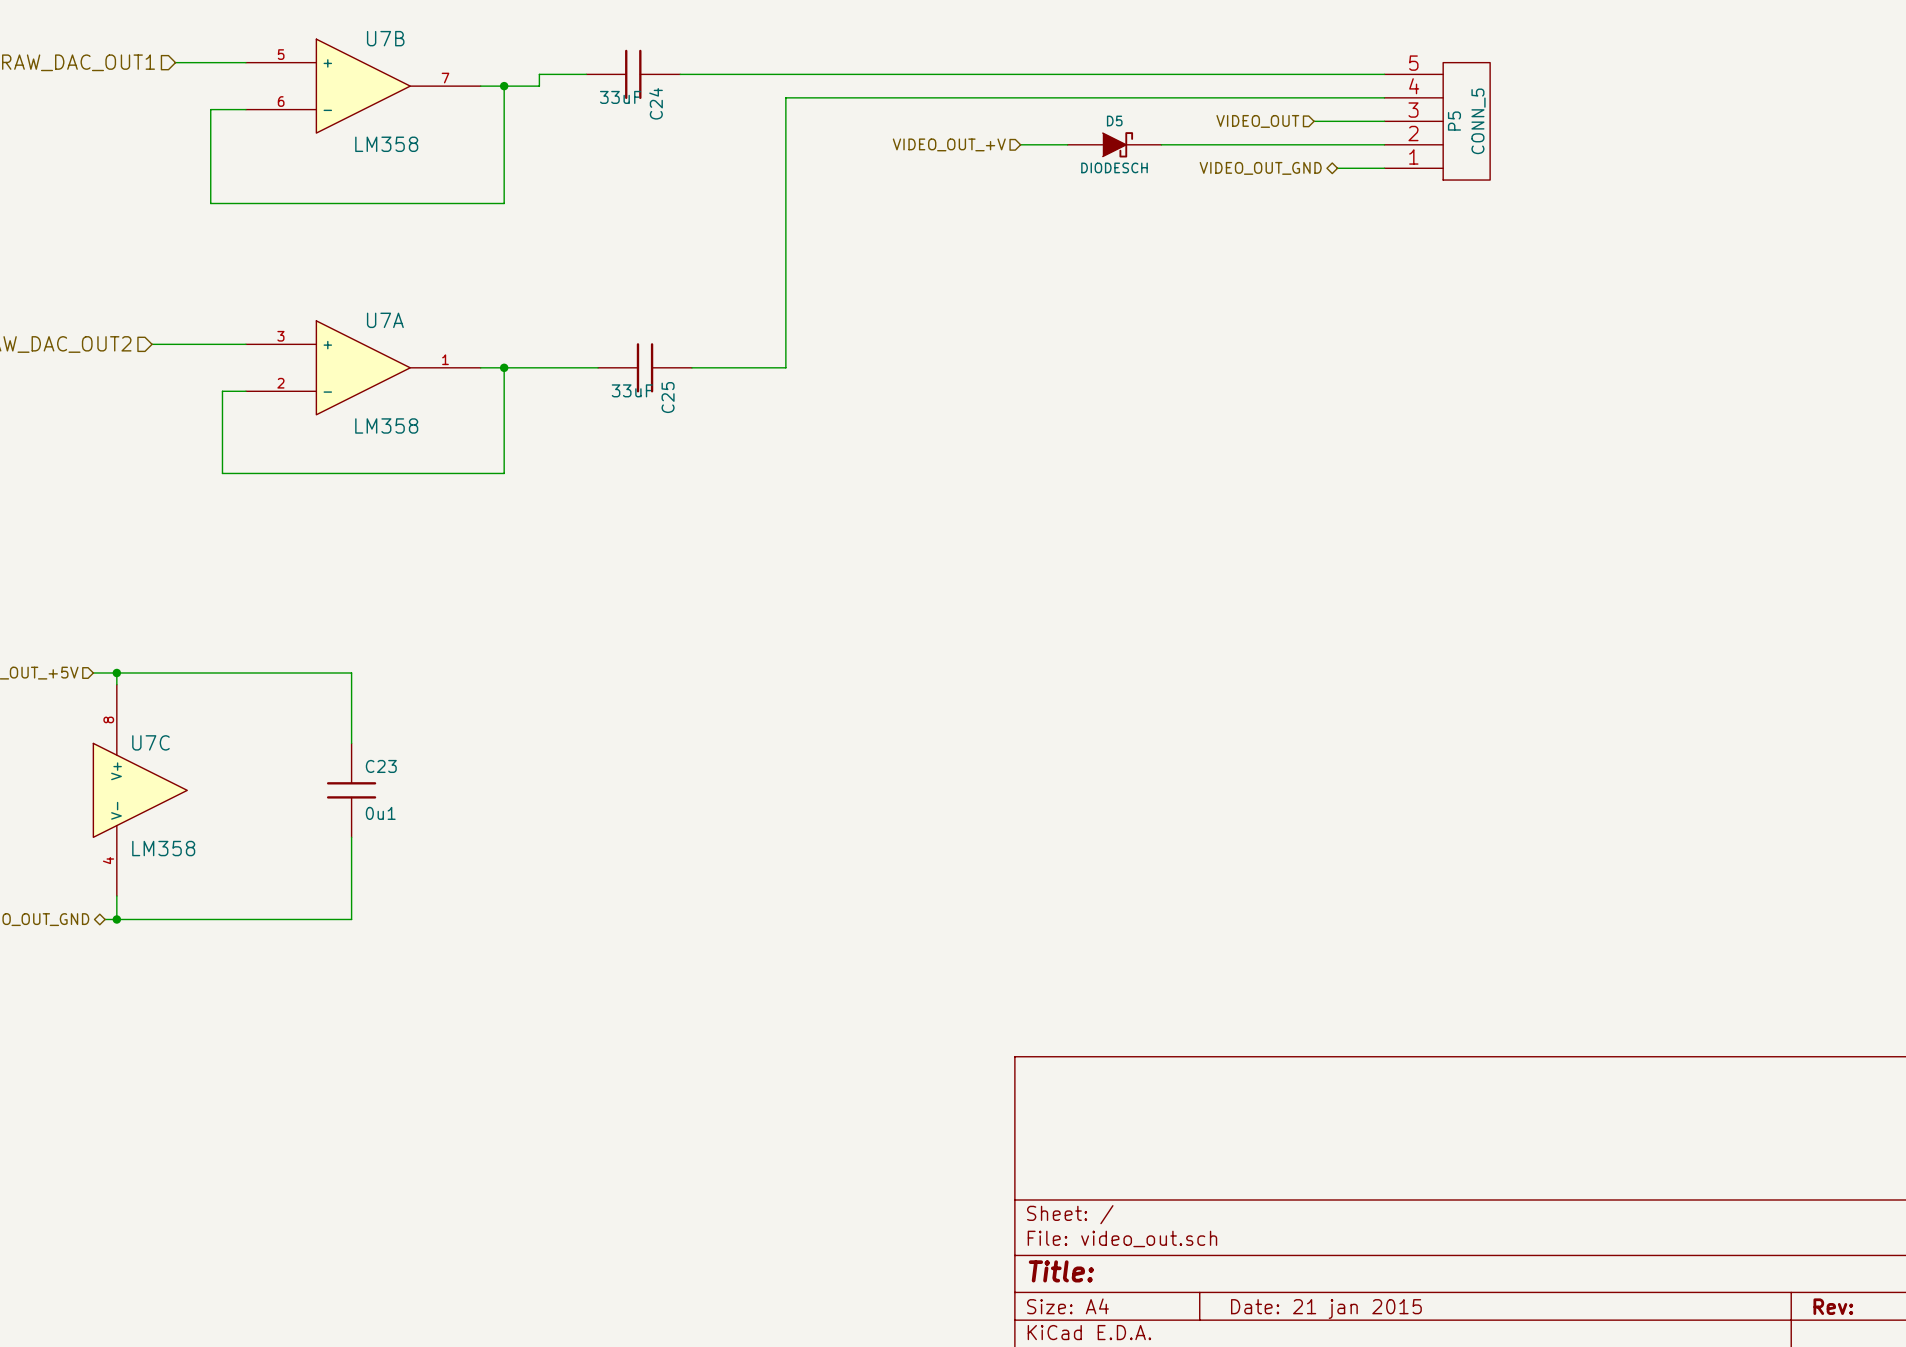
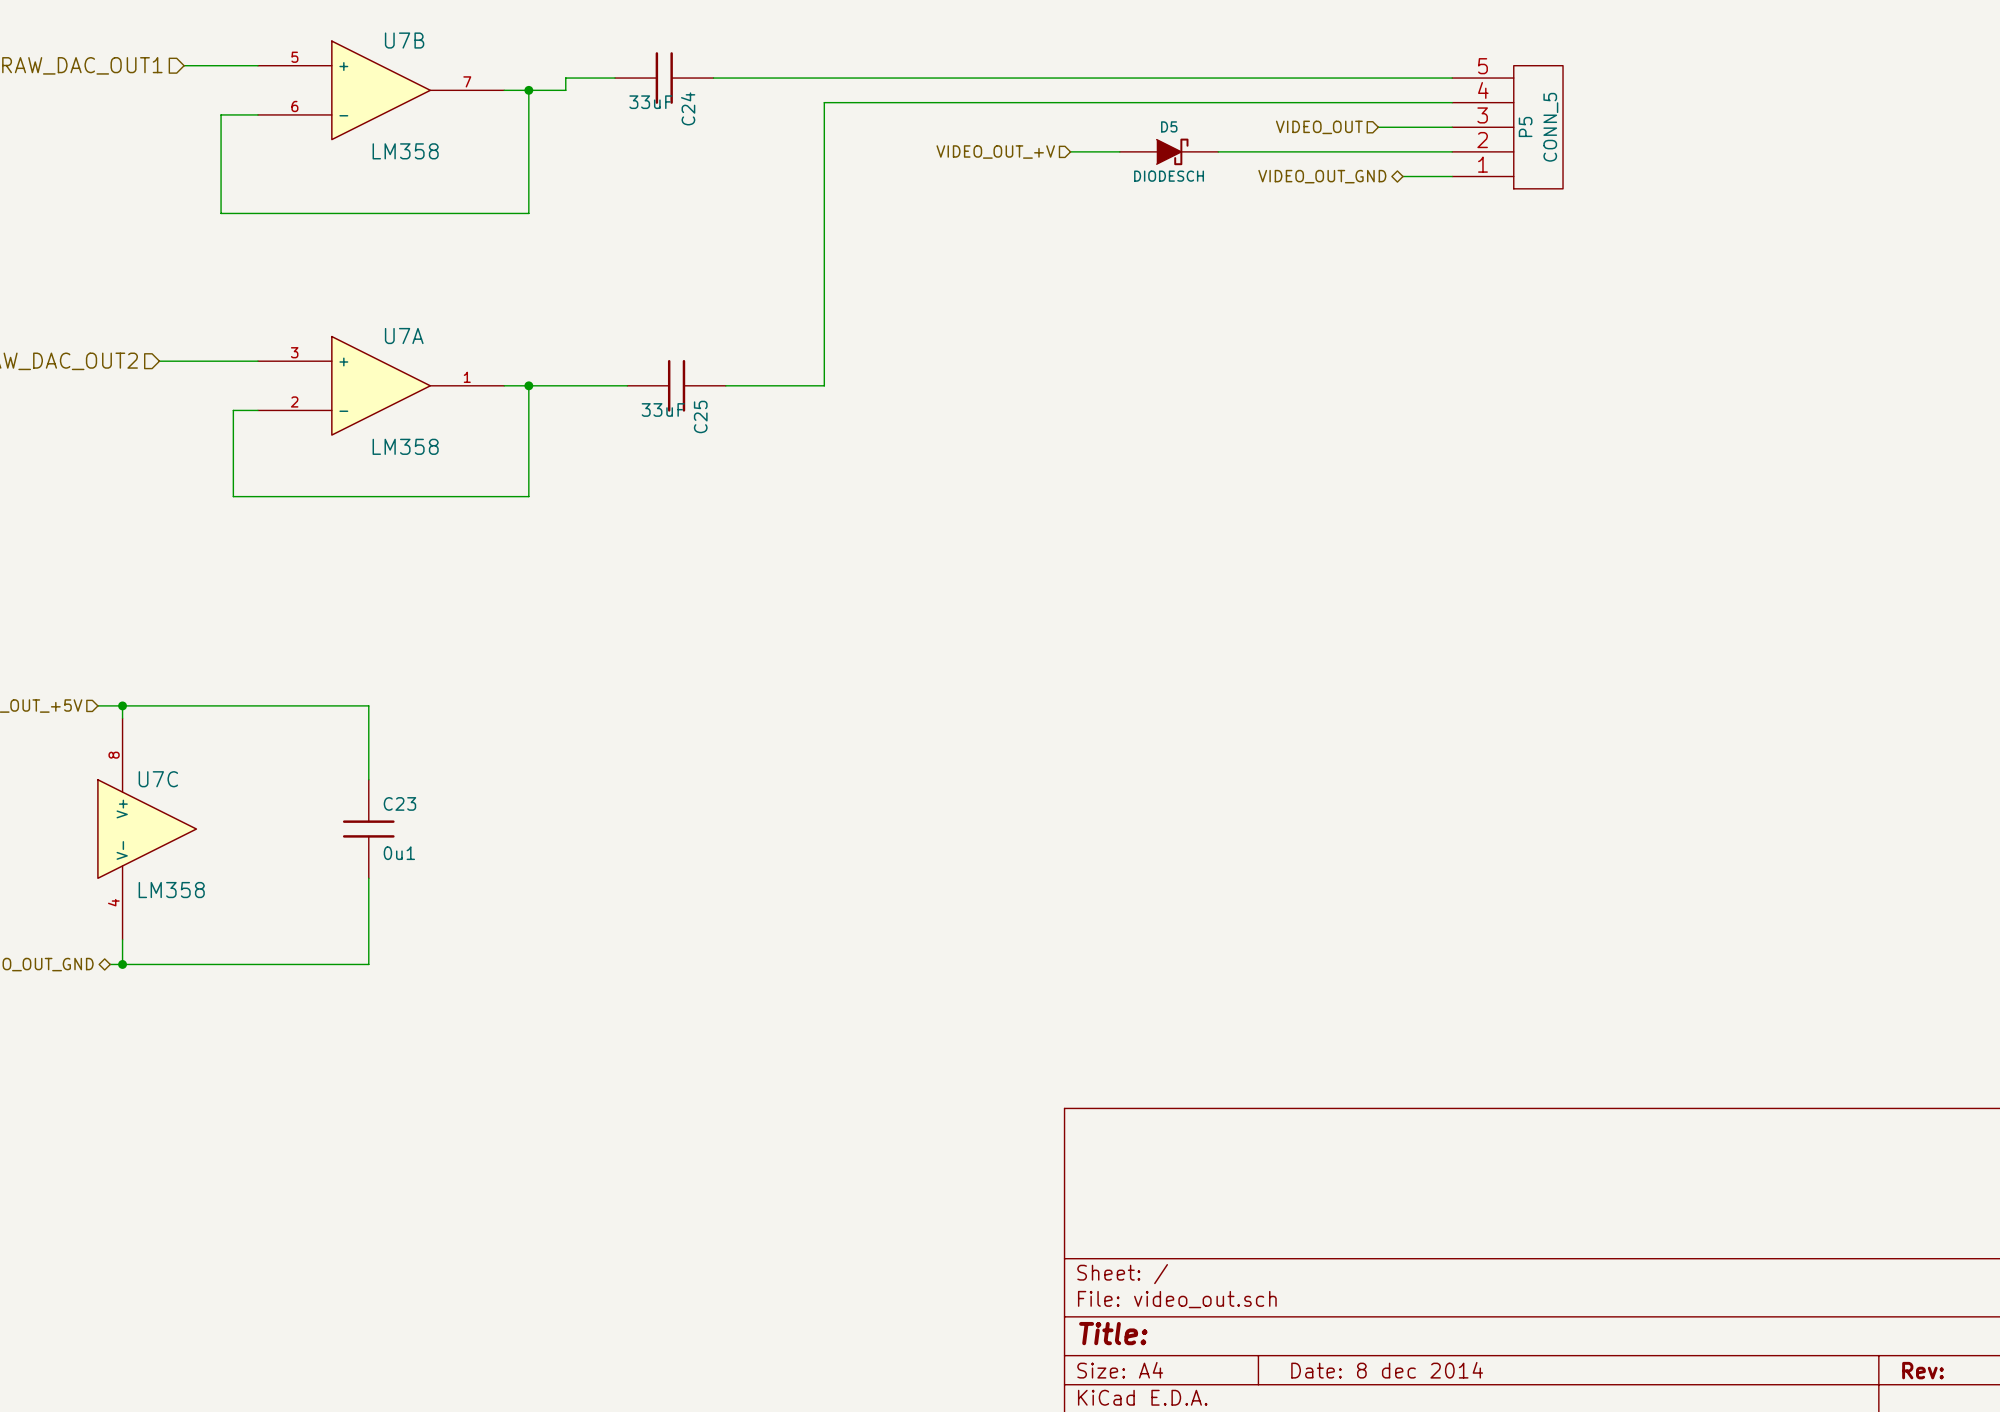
title block: Date: 21 jan 2015 (1326, 1308) -> Date: 8 dec 2014 (1387, 1370)

